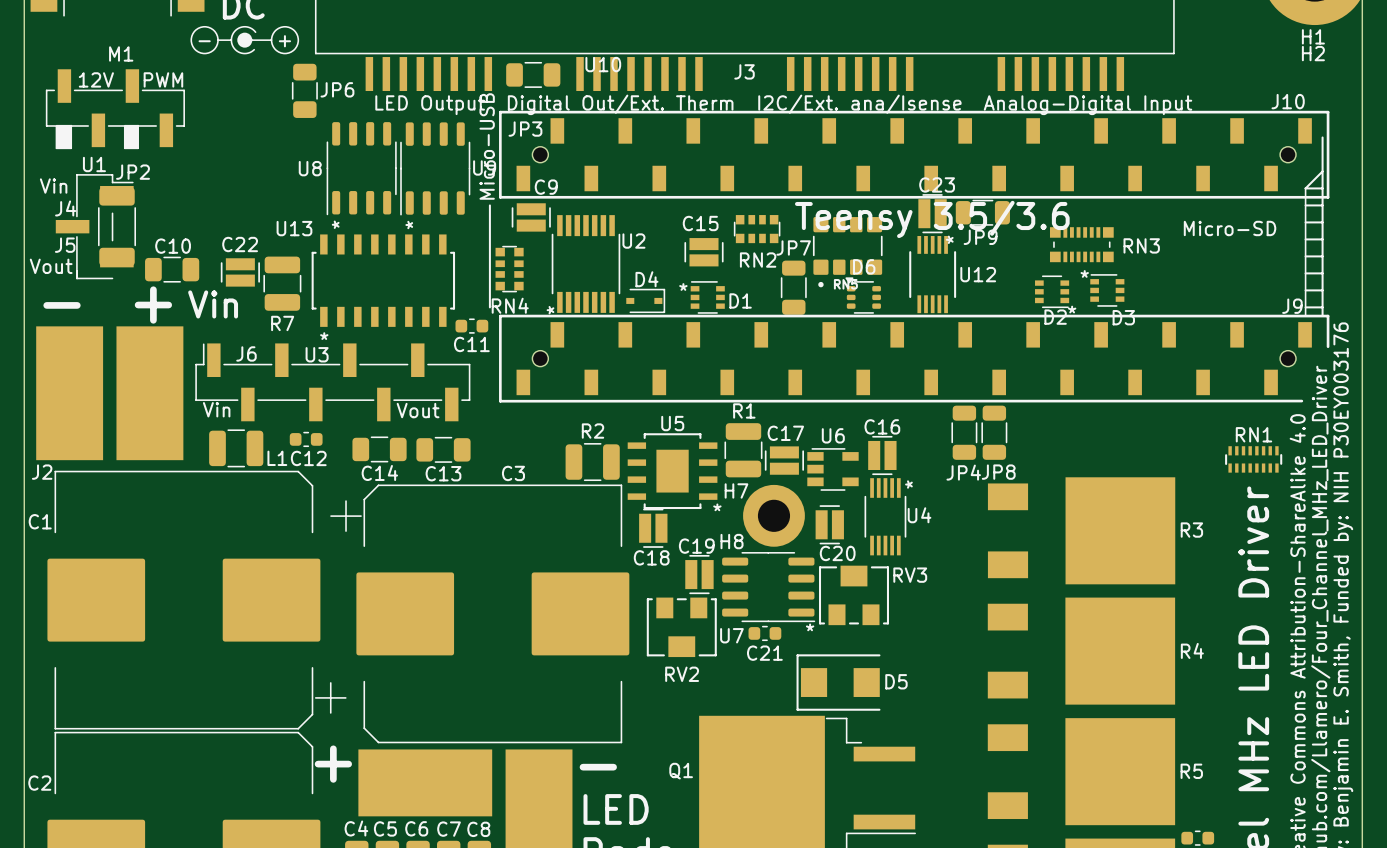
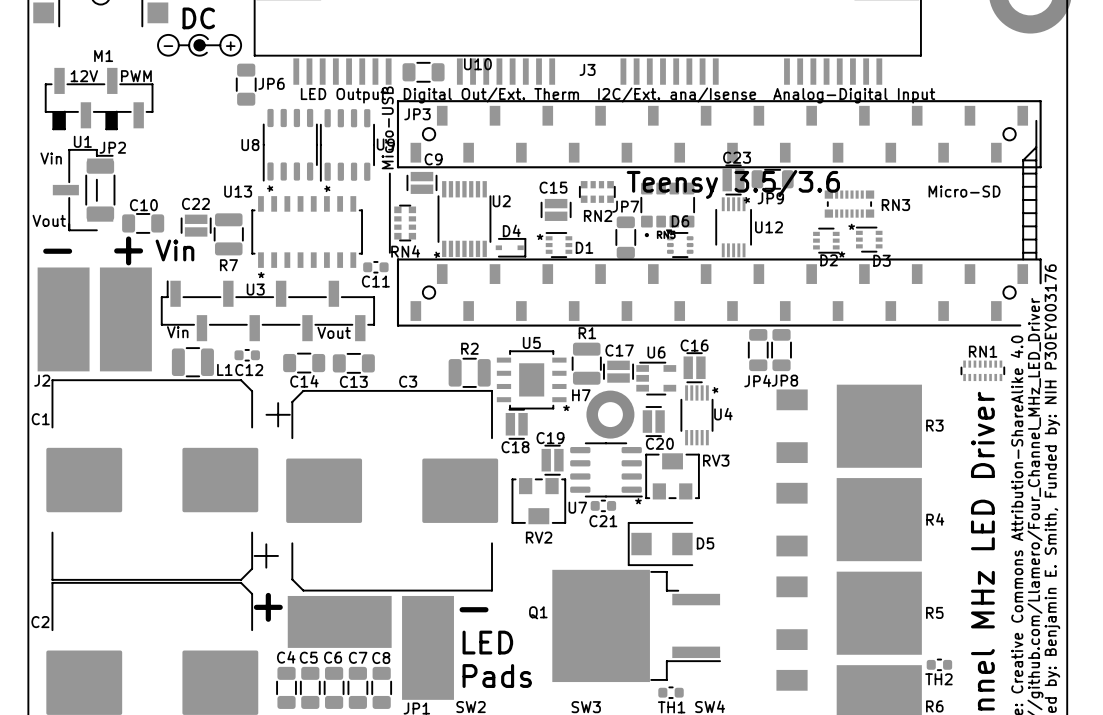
H1: (1313, 36) -> none
H2: (1313, 53) -> none
J10: (1288, 101) -> none
J4: (65, 208) -> none
J5: (65, 245) -> none
J9: (1292, 306) -> none
J6: (246, 353) -> none
H8: (732, 541) -> none

